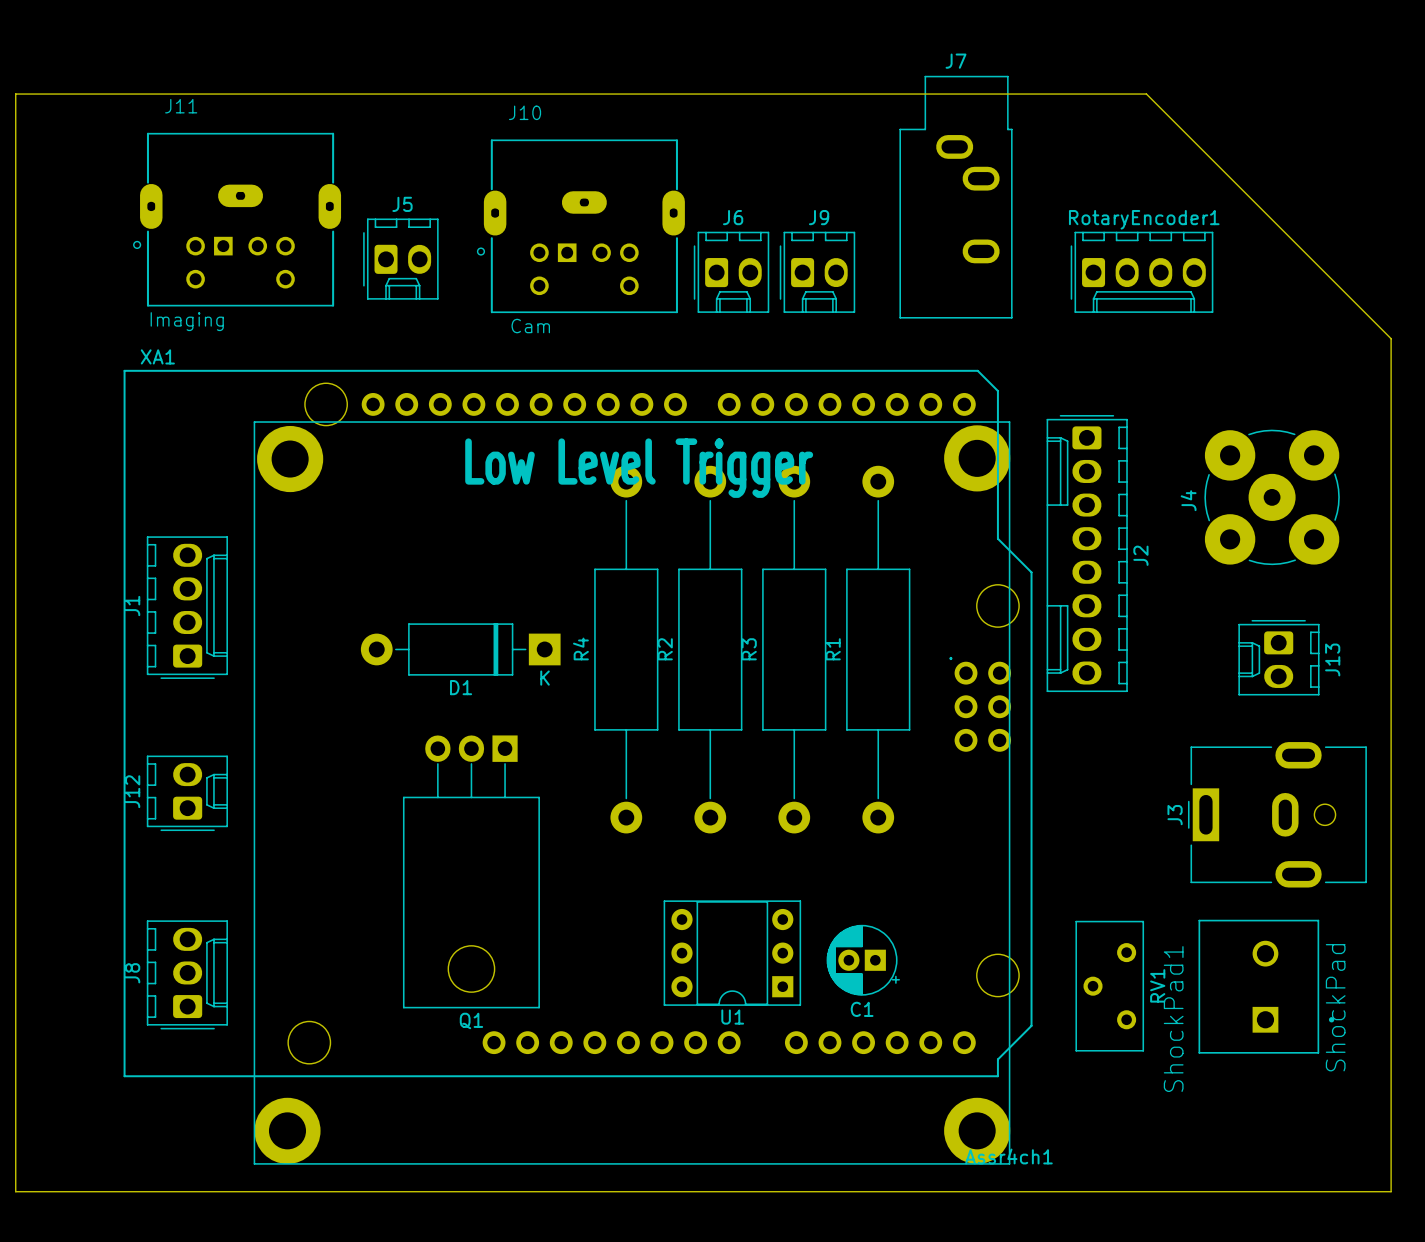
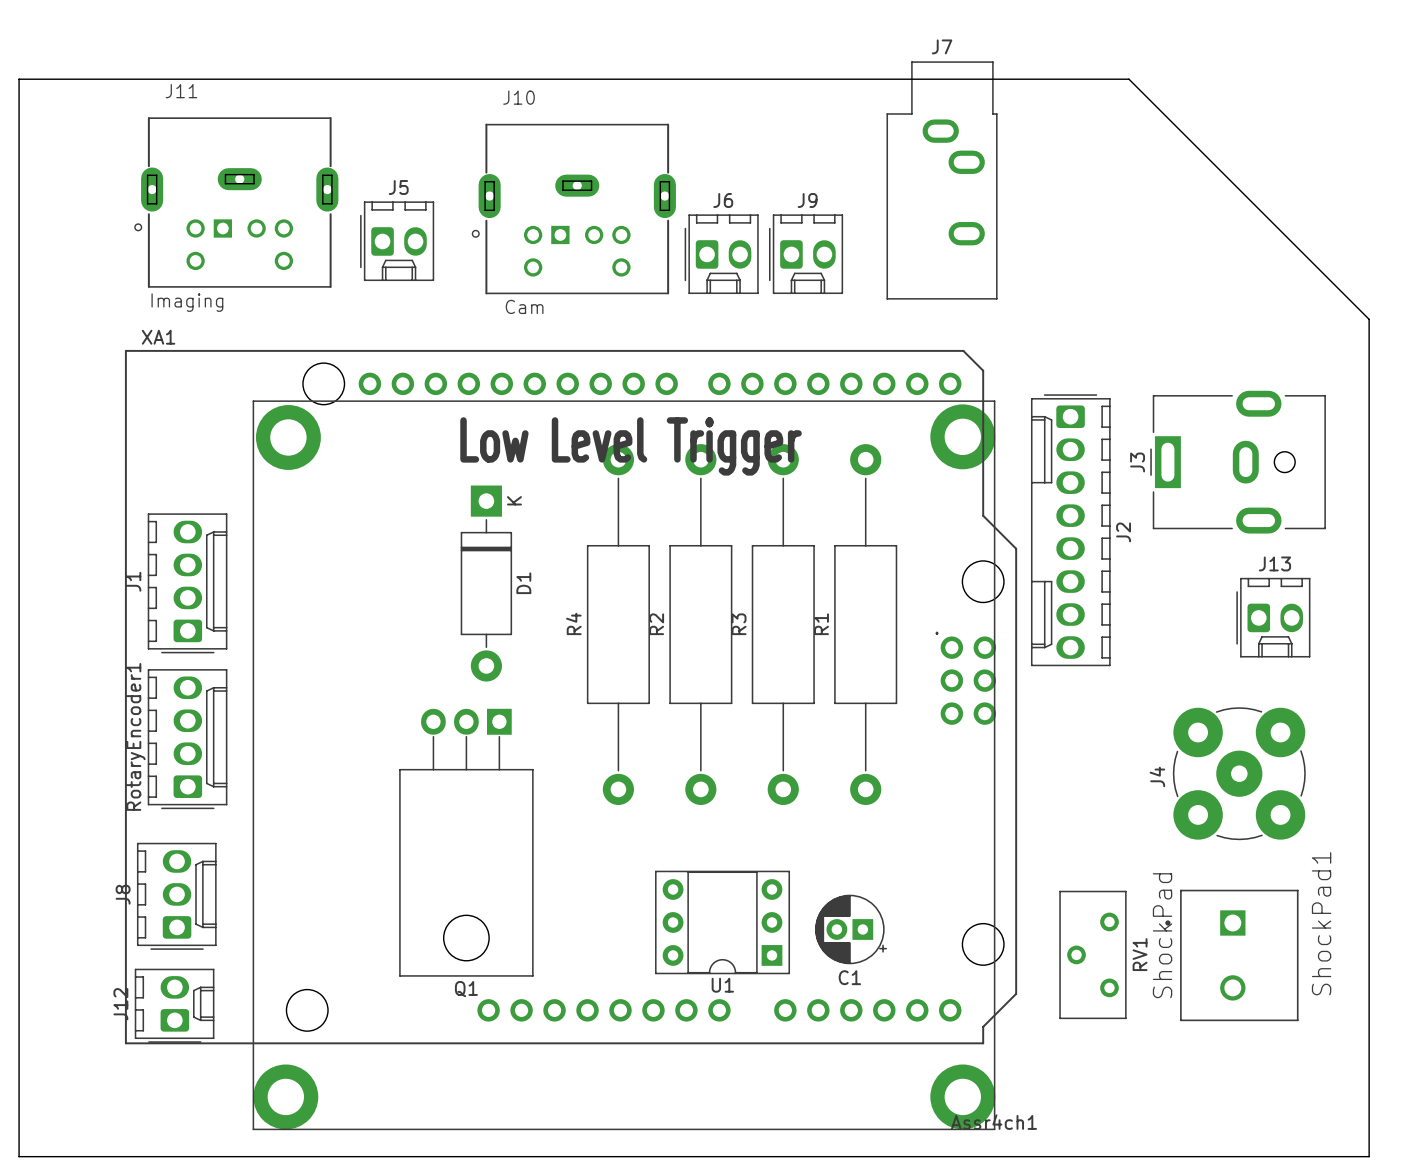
RotaryEncoder1 rotation: 0° (1142, 272) -> 90° counterclockwise (187, 739)
RotaryEncoder1 position: (1142, 272) -> (187, 739)
J4 position: (1272, 497) -> (1239, 773)
D1 rotation: 0° (460, 649) -> 90° counterclockwise (486, 583)
J13 rotation: 0° (1278, 657) -> 90° counterclockwise (1273, 617)
J12 position: (187, 793) -> (174, 1005)
J3 position: (1277, 814) -> (1238, 462)
J8 position: (187, 974) -> (176, 896)
ShockPad1 rotation: 0° (1266, 986) -> 180° (1231, 955)

